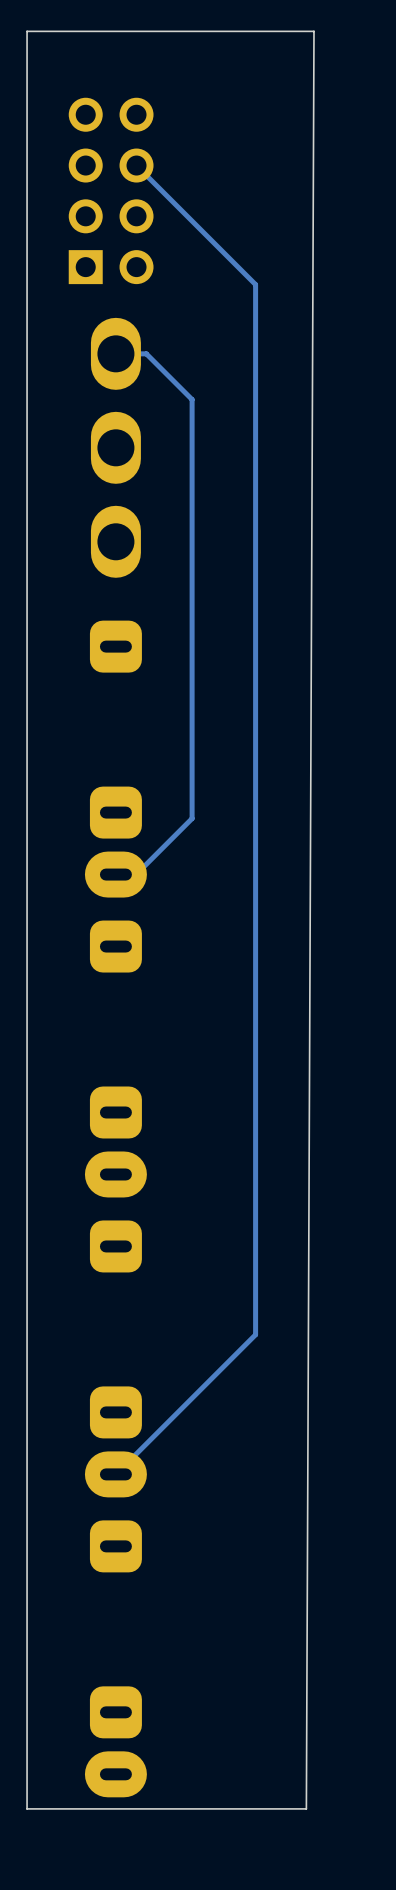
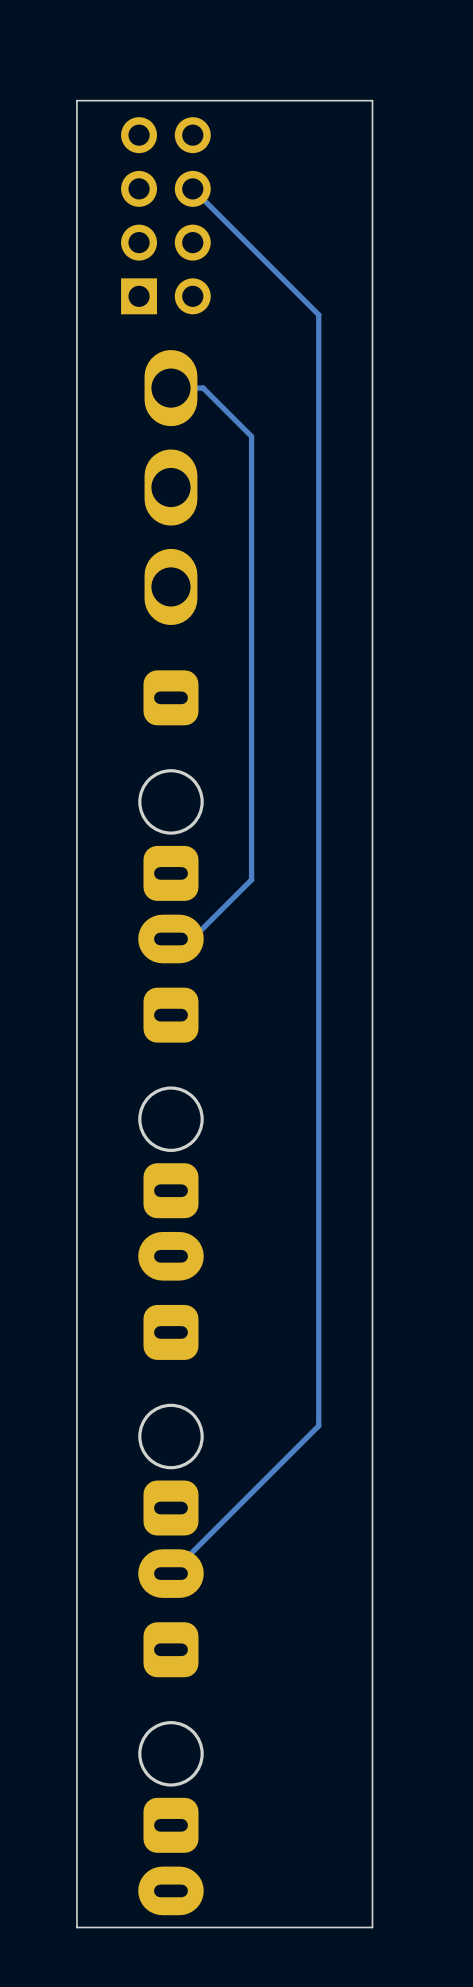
board edge: (27, 82) (27, 31) (313, 31) (306, 1808) -> (76, 100) (372, 100) (372, 1927)
round board edge: none -> [138, 769, 204, 835]
round board edge: none -> [138, 1086, 204, 1152]
round board edge: none -> [138, 1403, 204, 1470]
round board edge: none -> [138, 1721, 204, 1787]

